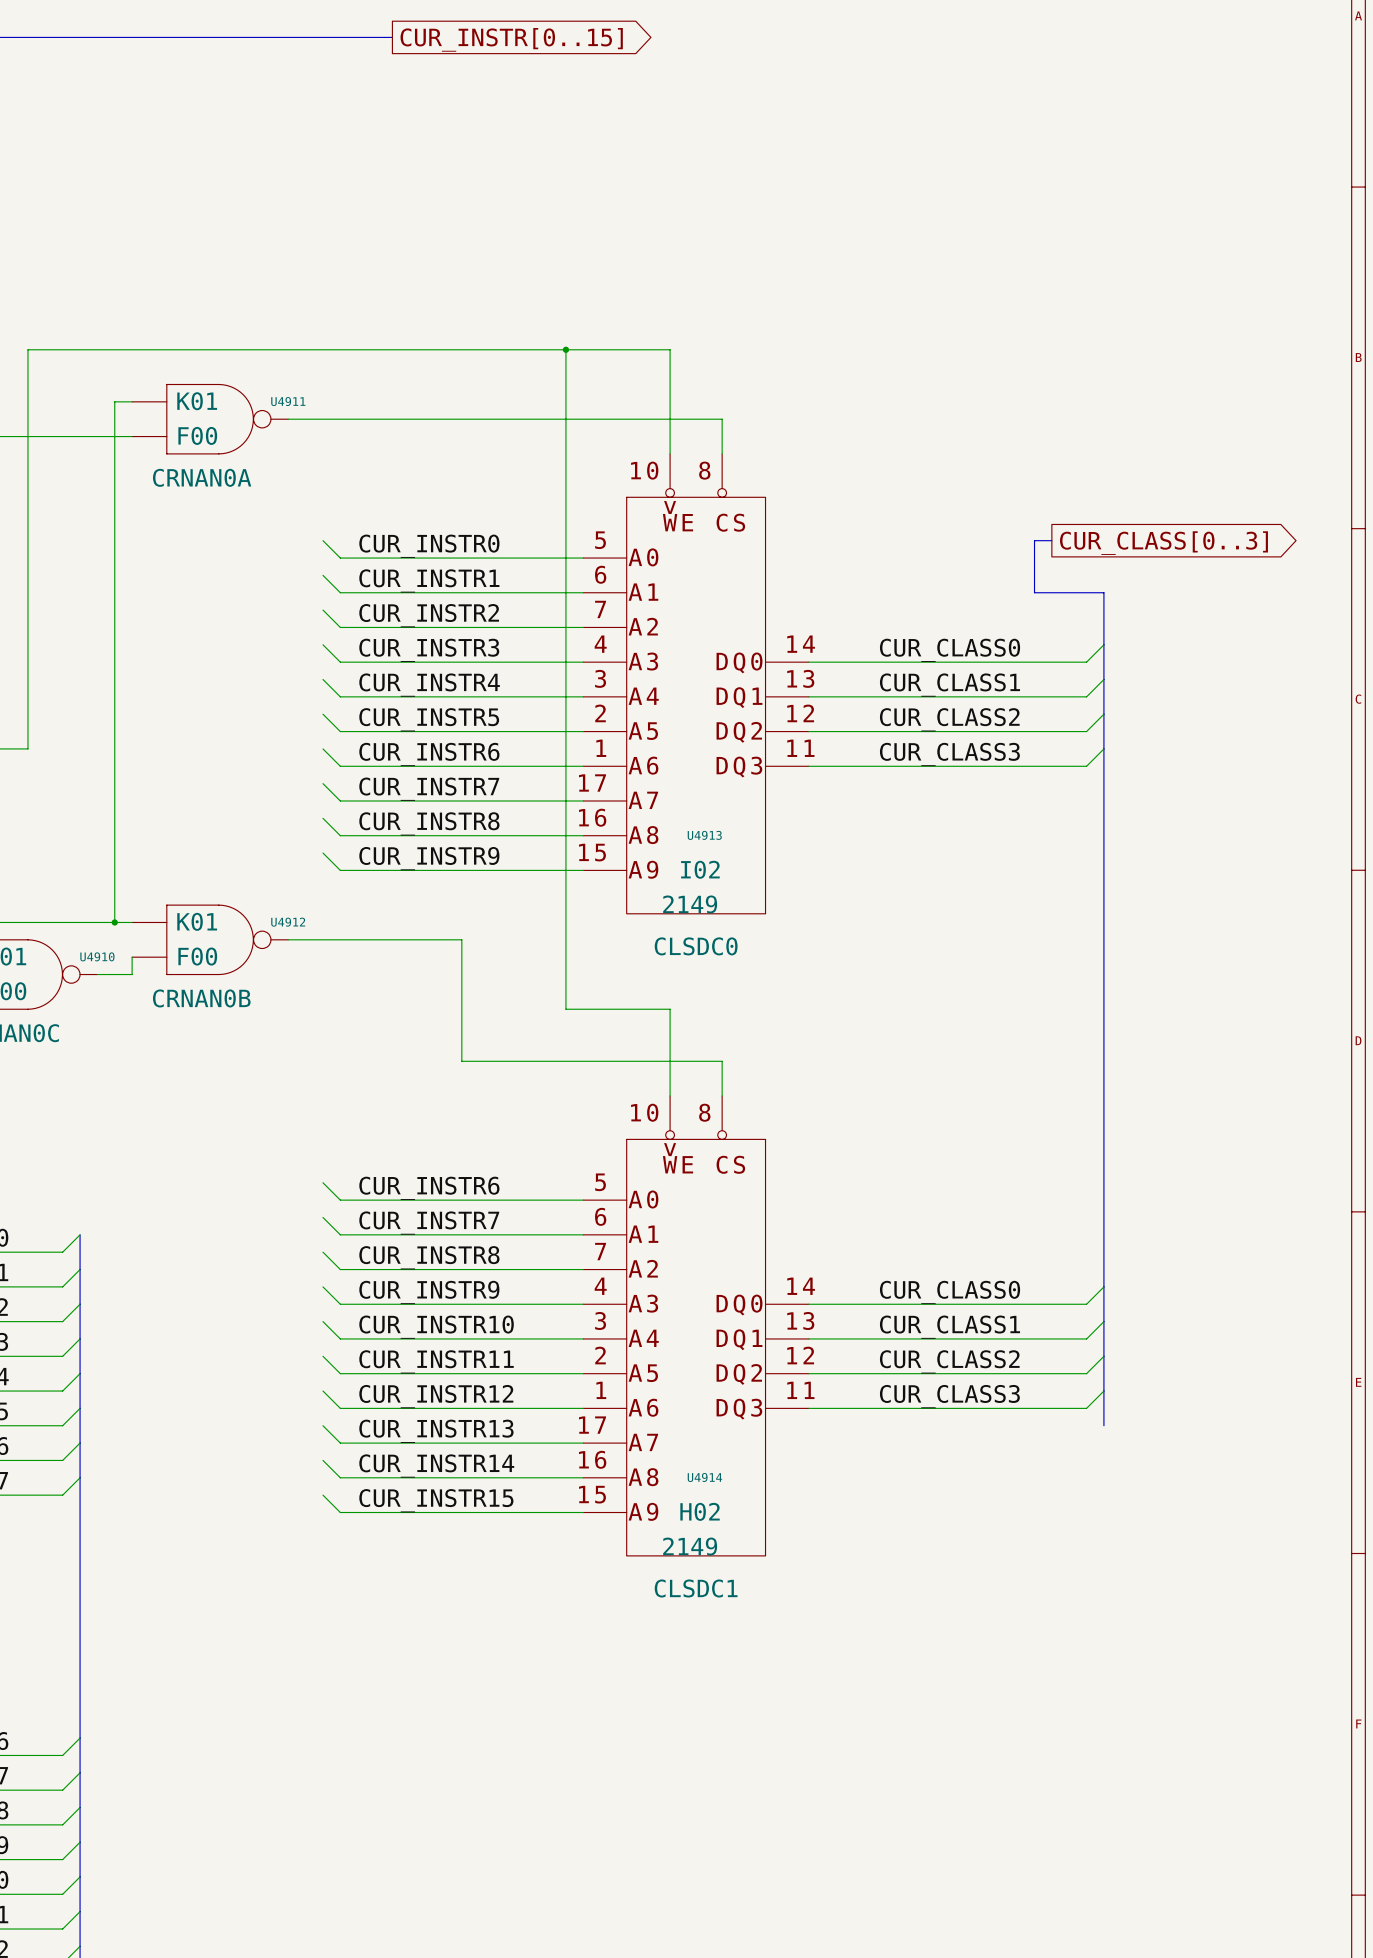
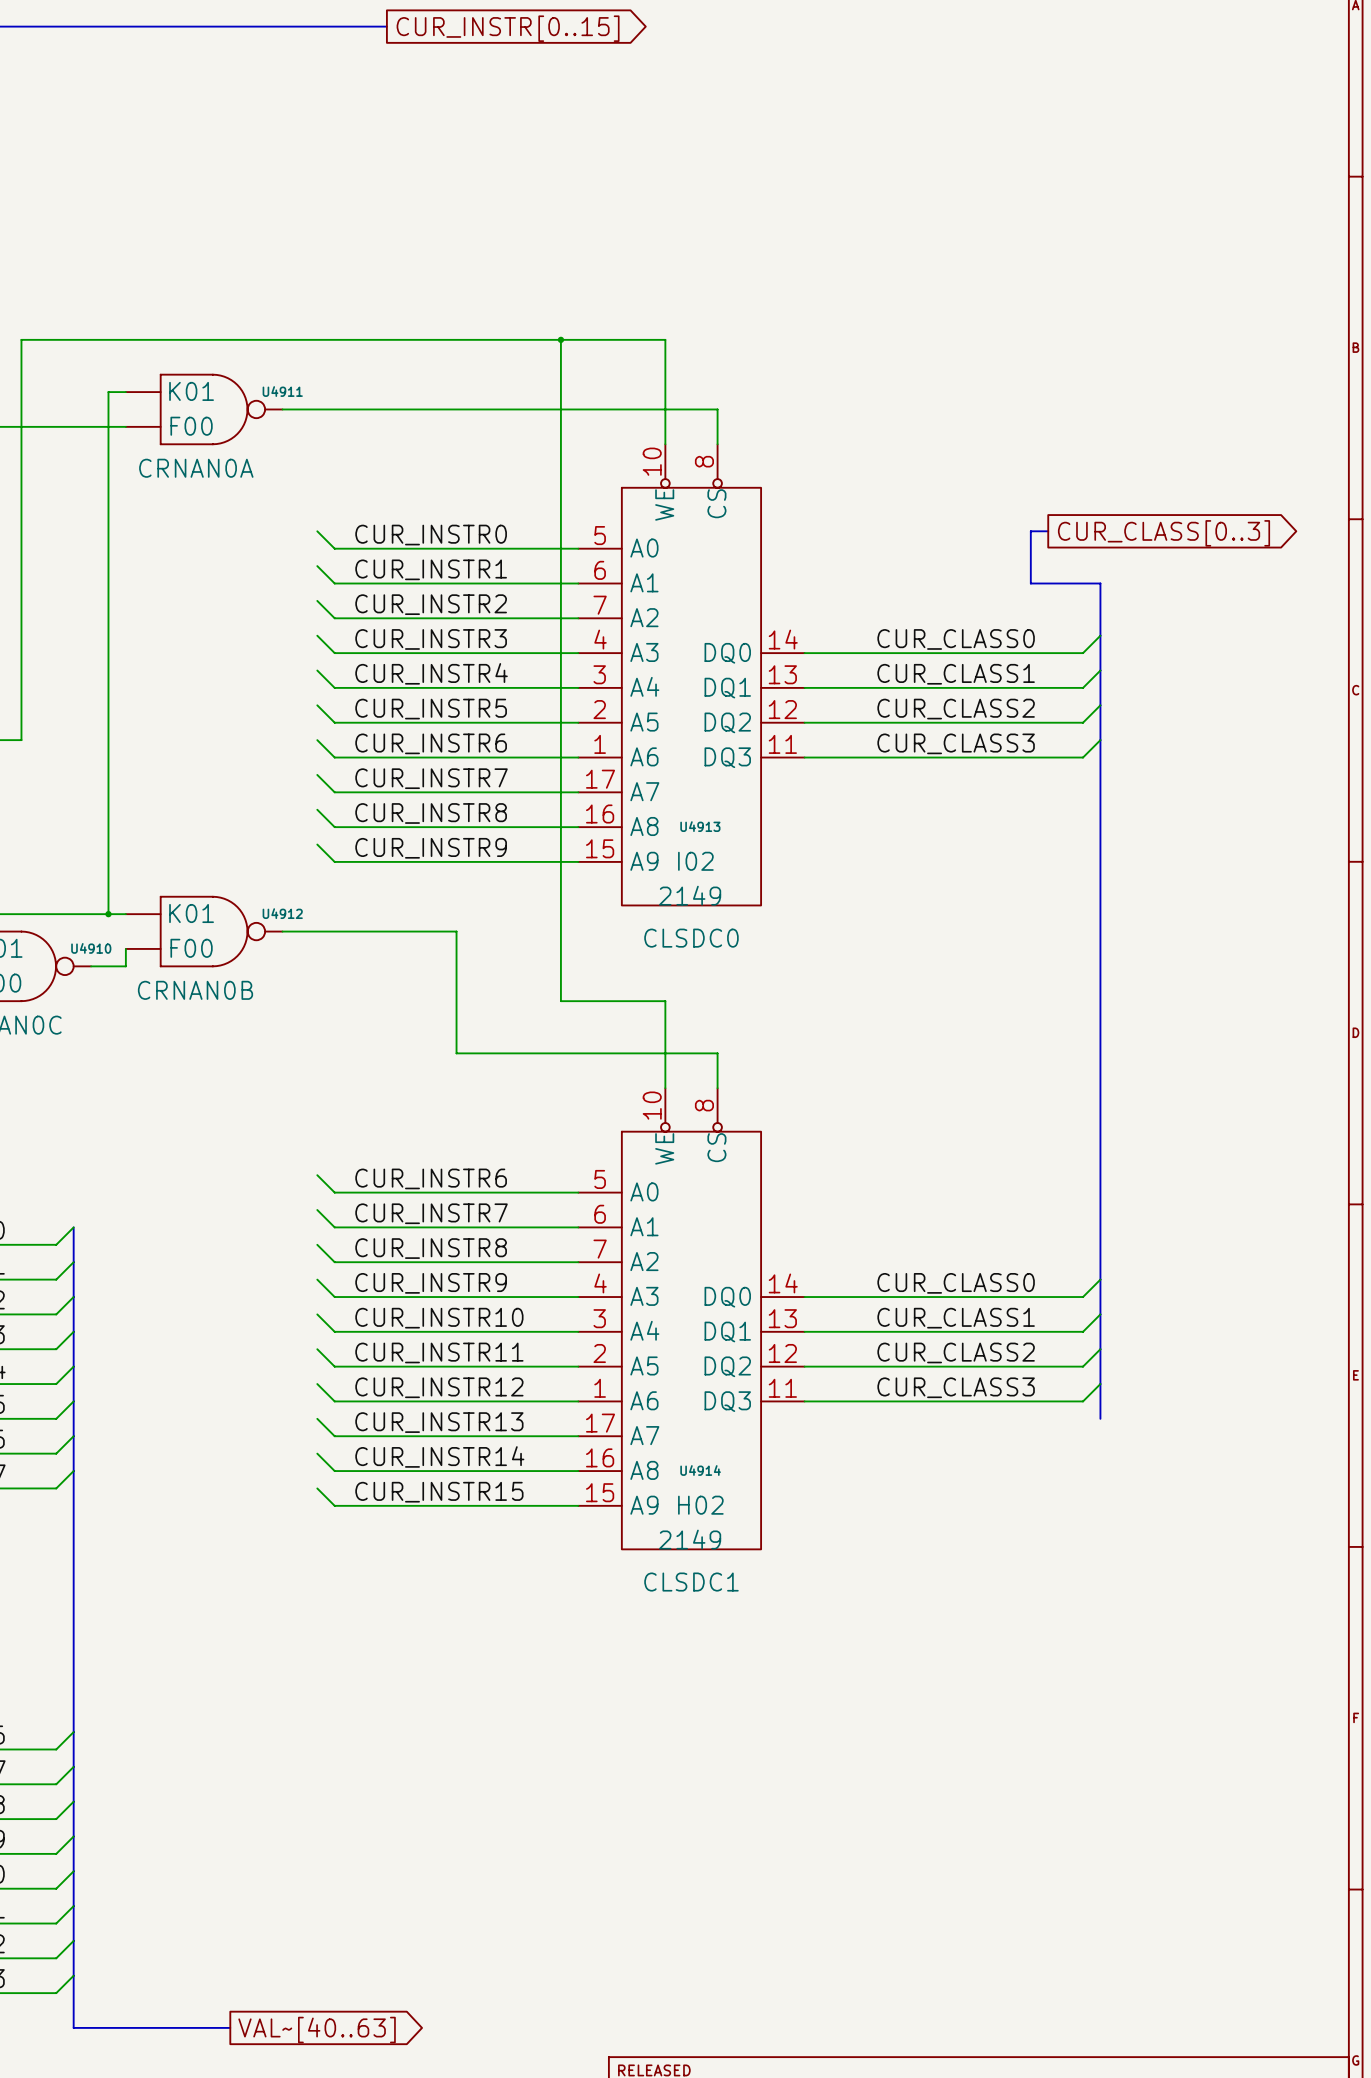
U4913 symbol: [583, 453, 809, 914] -> [578, 444, 805, 906]
U4914 symbol: [583, 1096, 809, 1556] -> [578, 1088, 805, 1550]

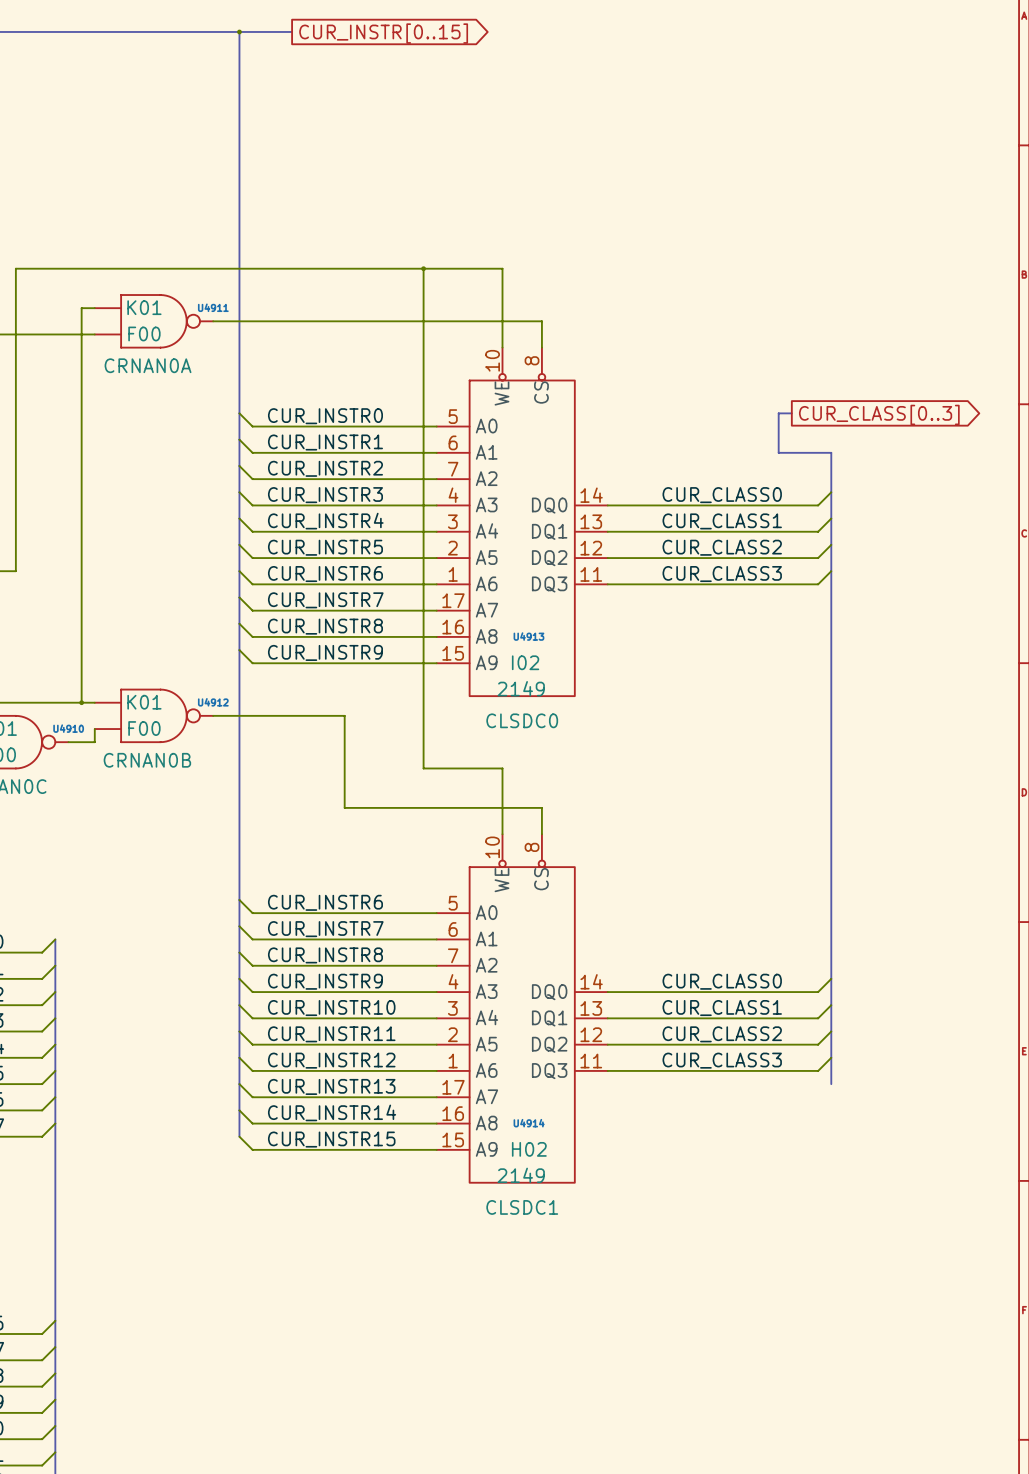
bus: none -> (239, 31) (239, 1136)
junction: none -> (239, 31)

